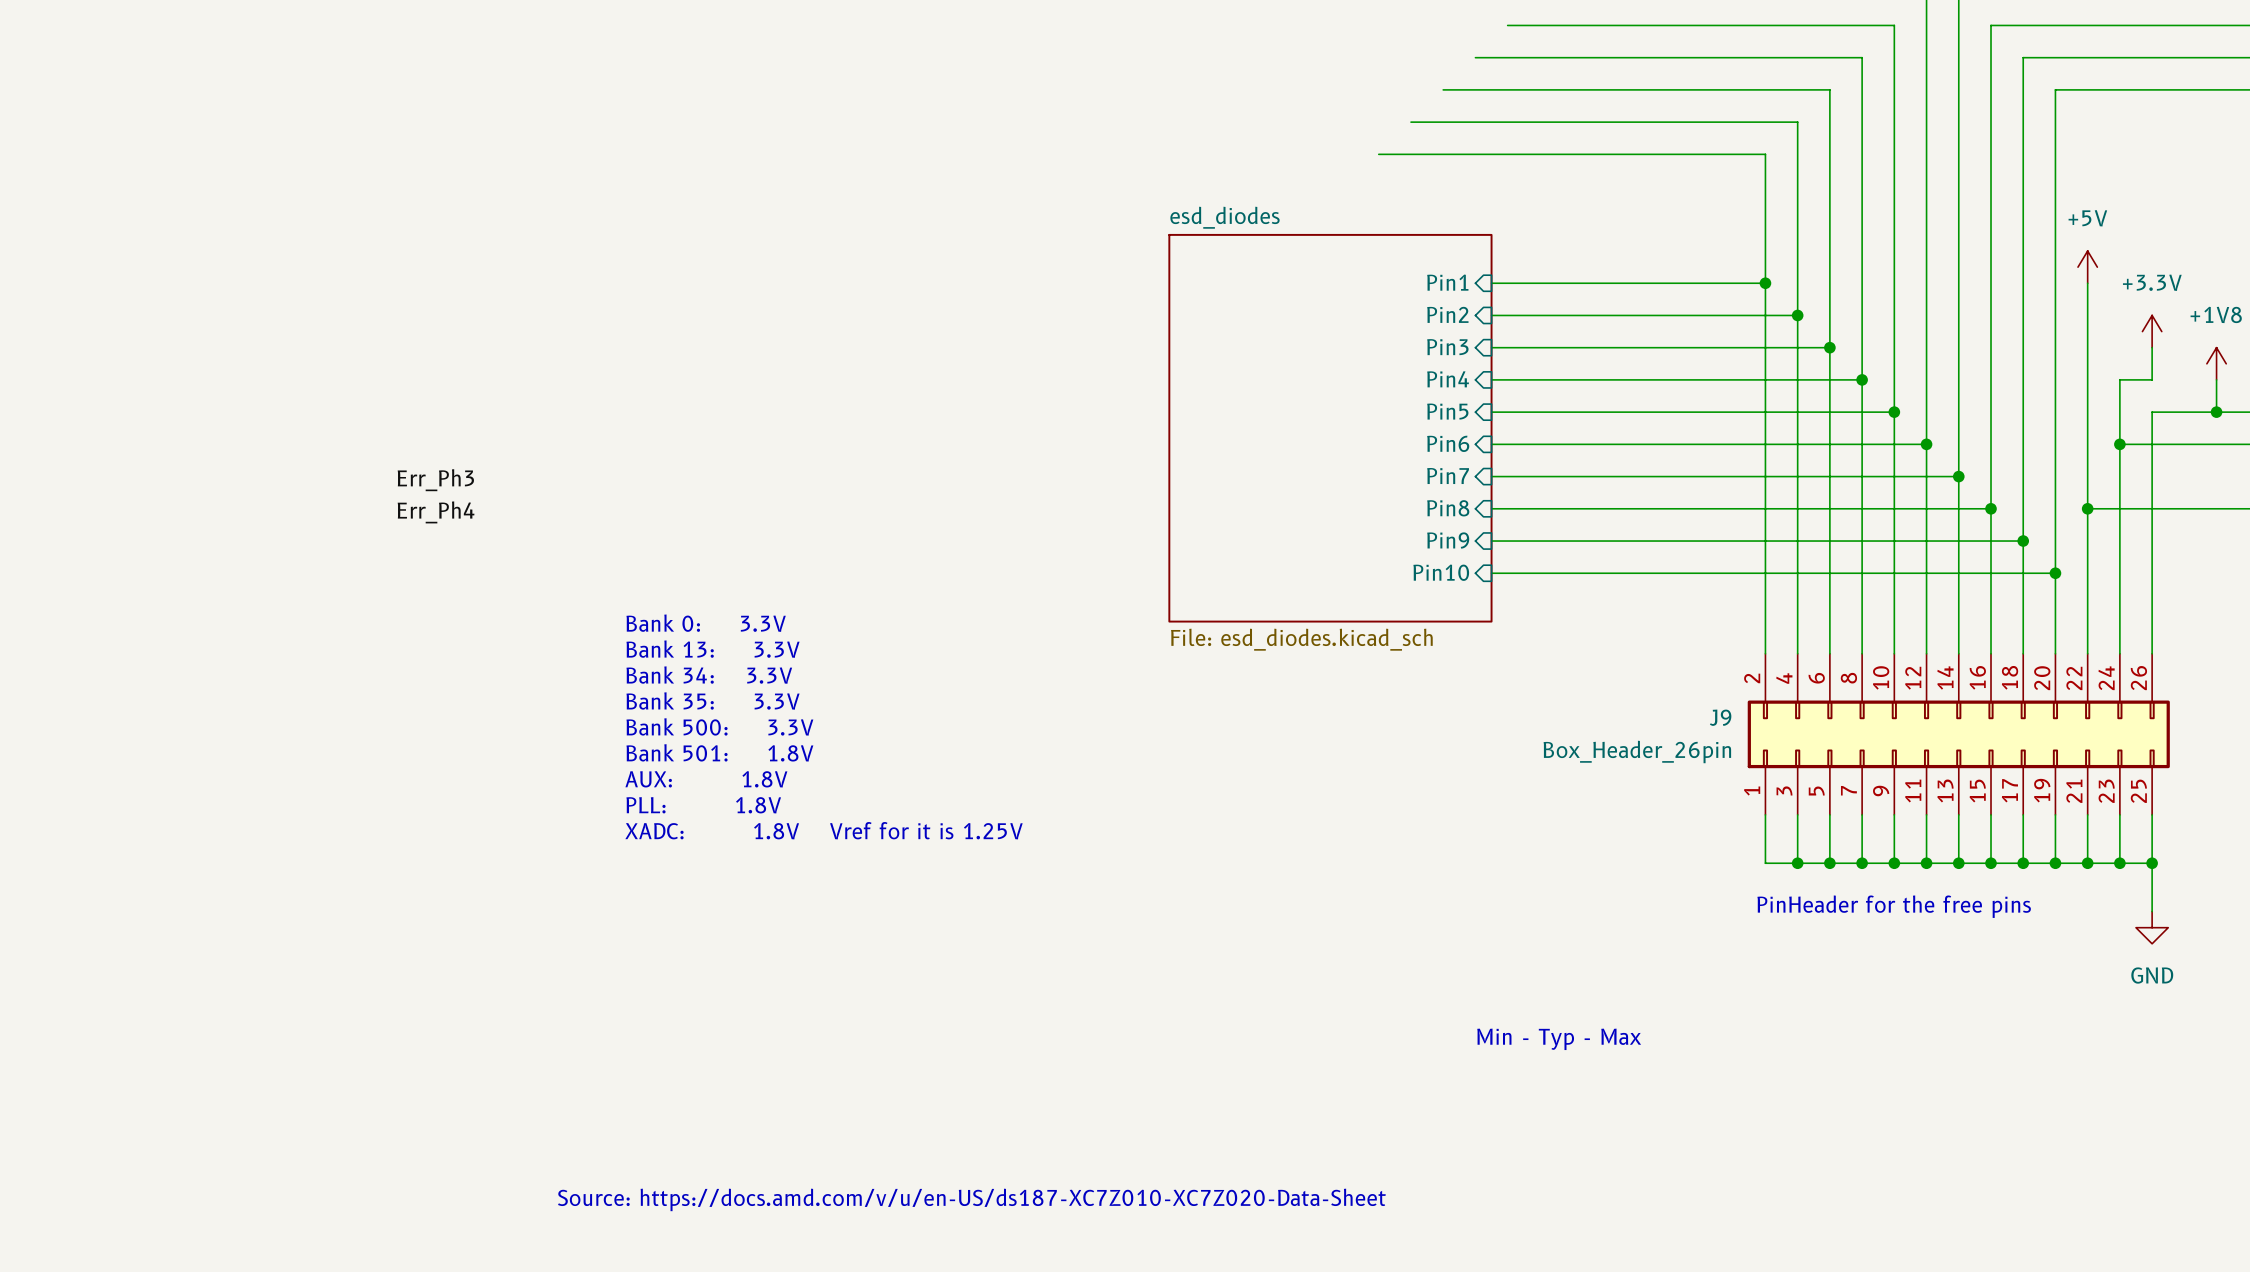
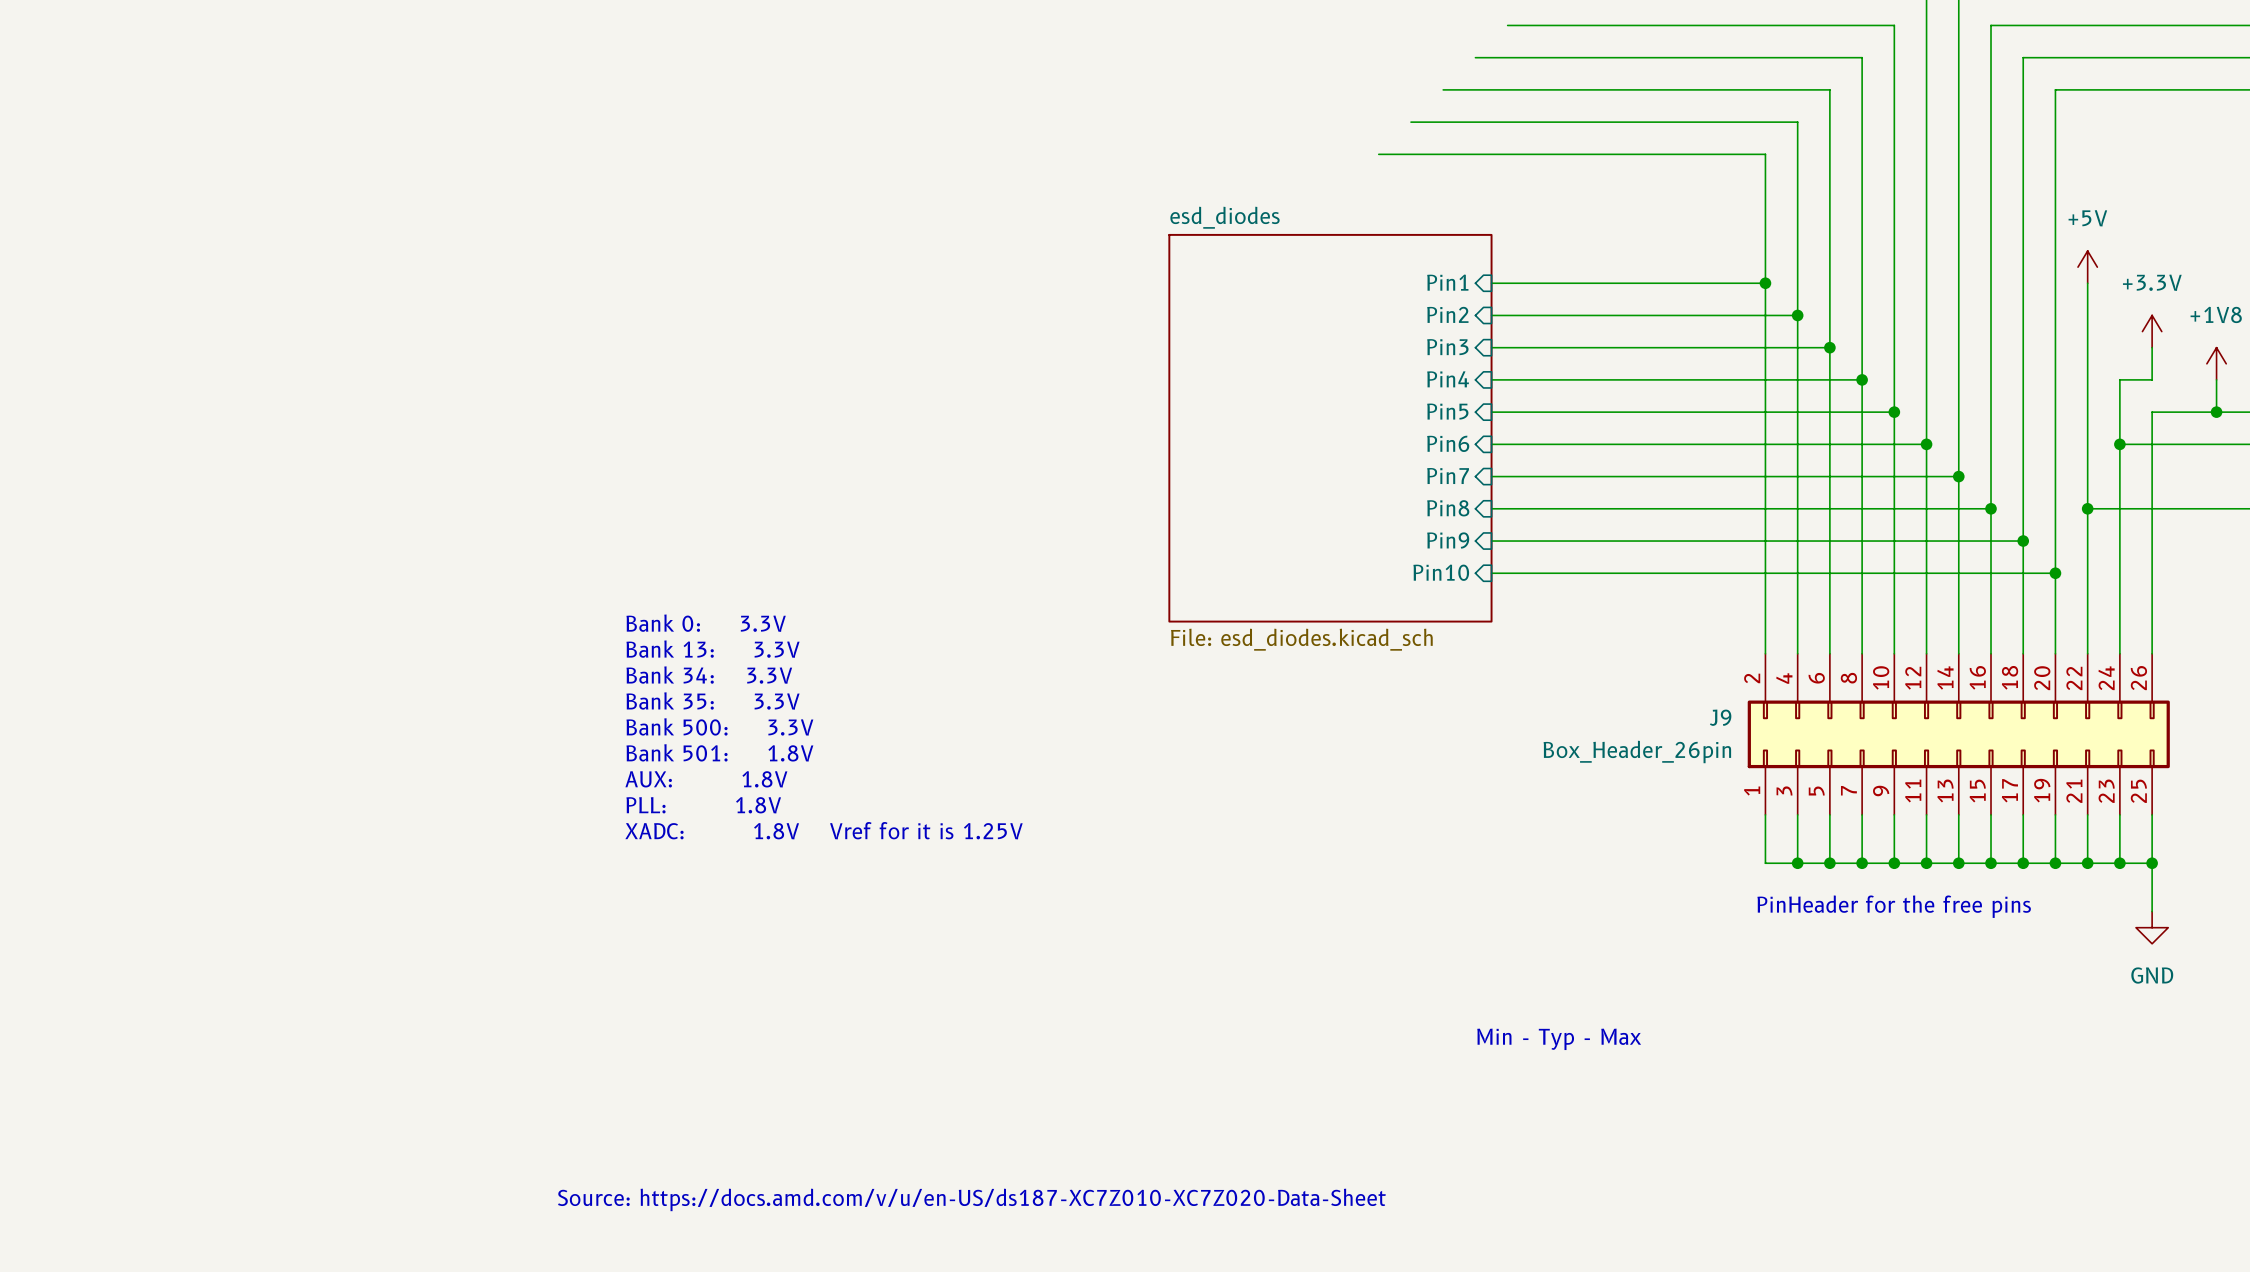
label: Err_Ph3 (435, 480) -> none
label: Err_Ph4 (436, 512) -> none

